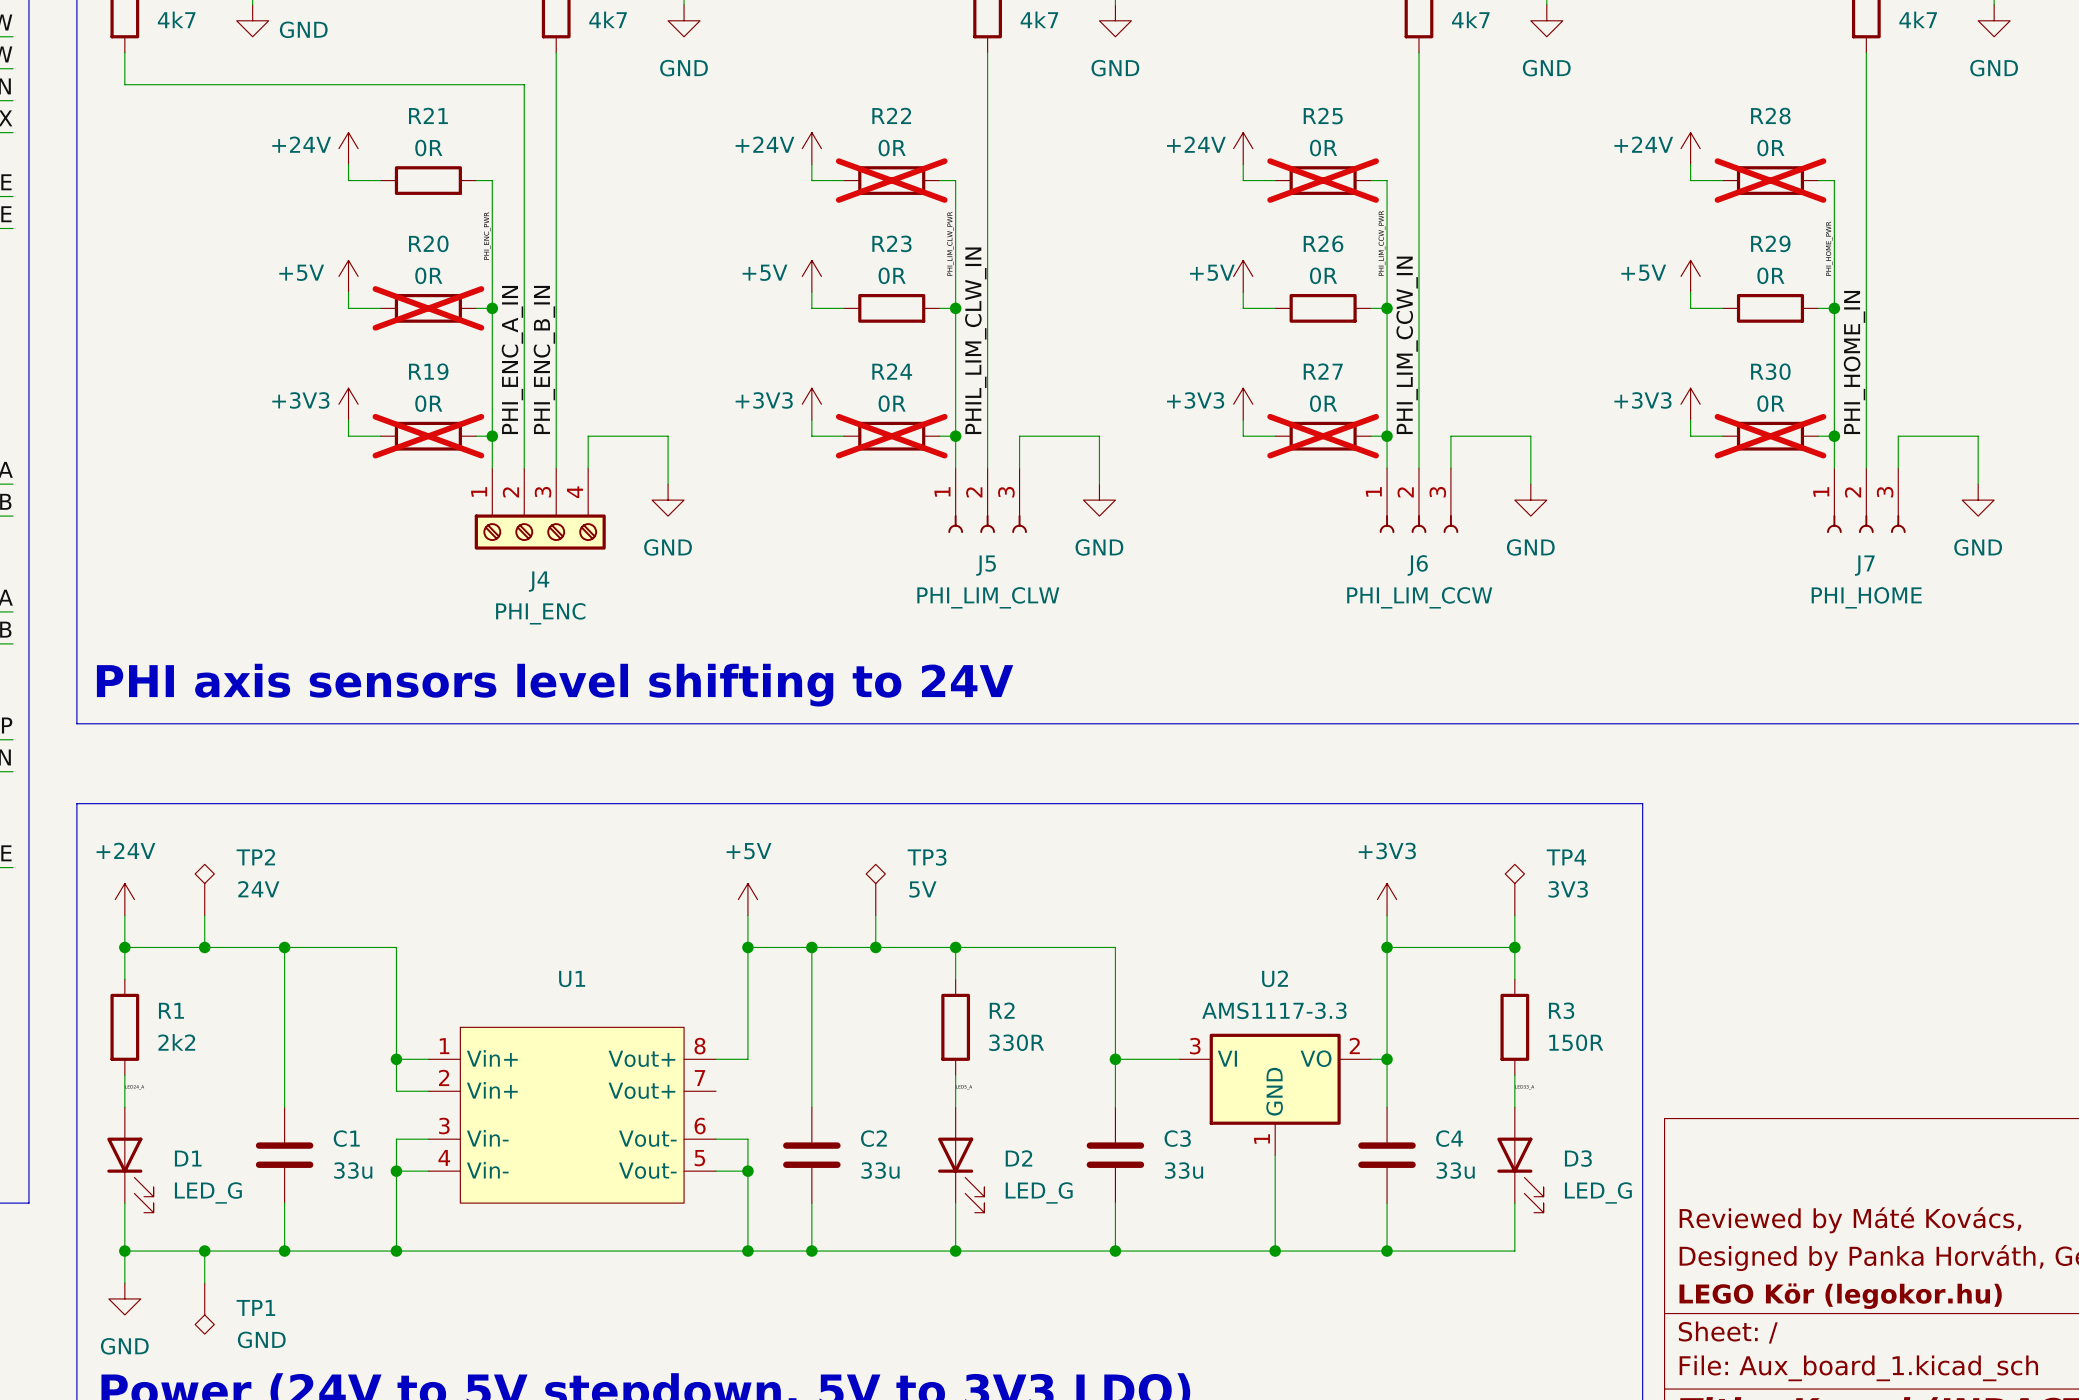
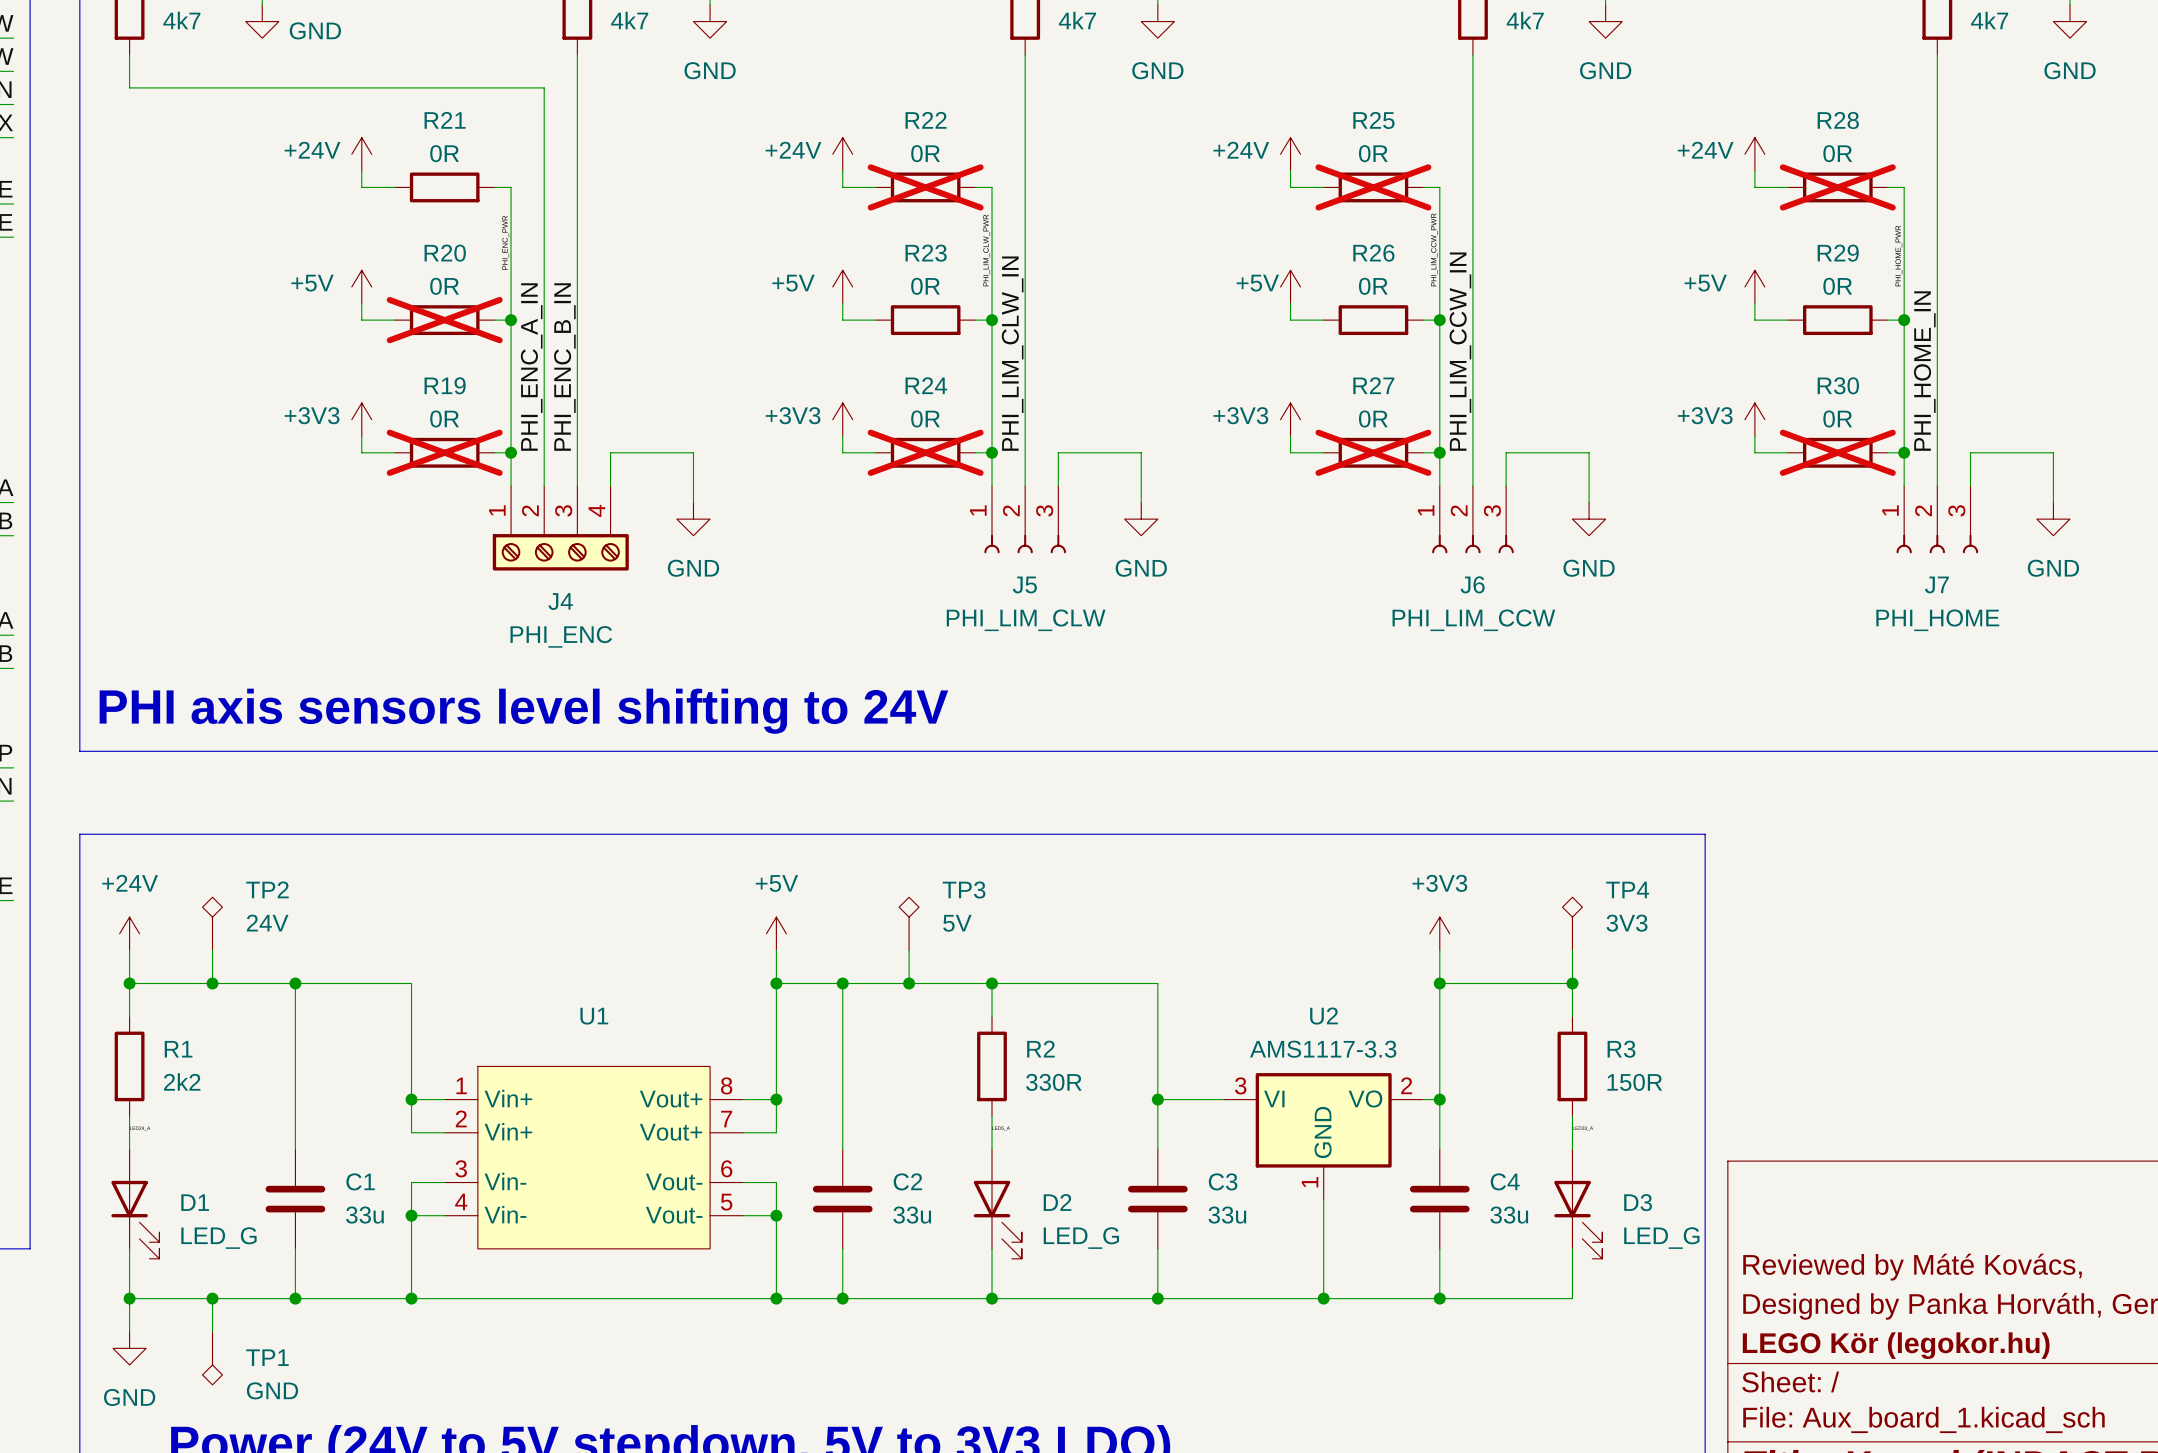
label: PHIL_LIM_CLW_IN (975, 340) -> PHI_LIM_CLW_IN (1012, 353)
wire: none -> (776, 1099) (776, 1132) (743, 1132)
junction: none -> (776, 1099)

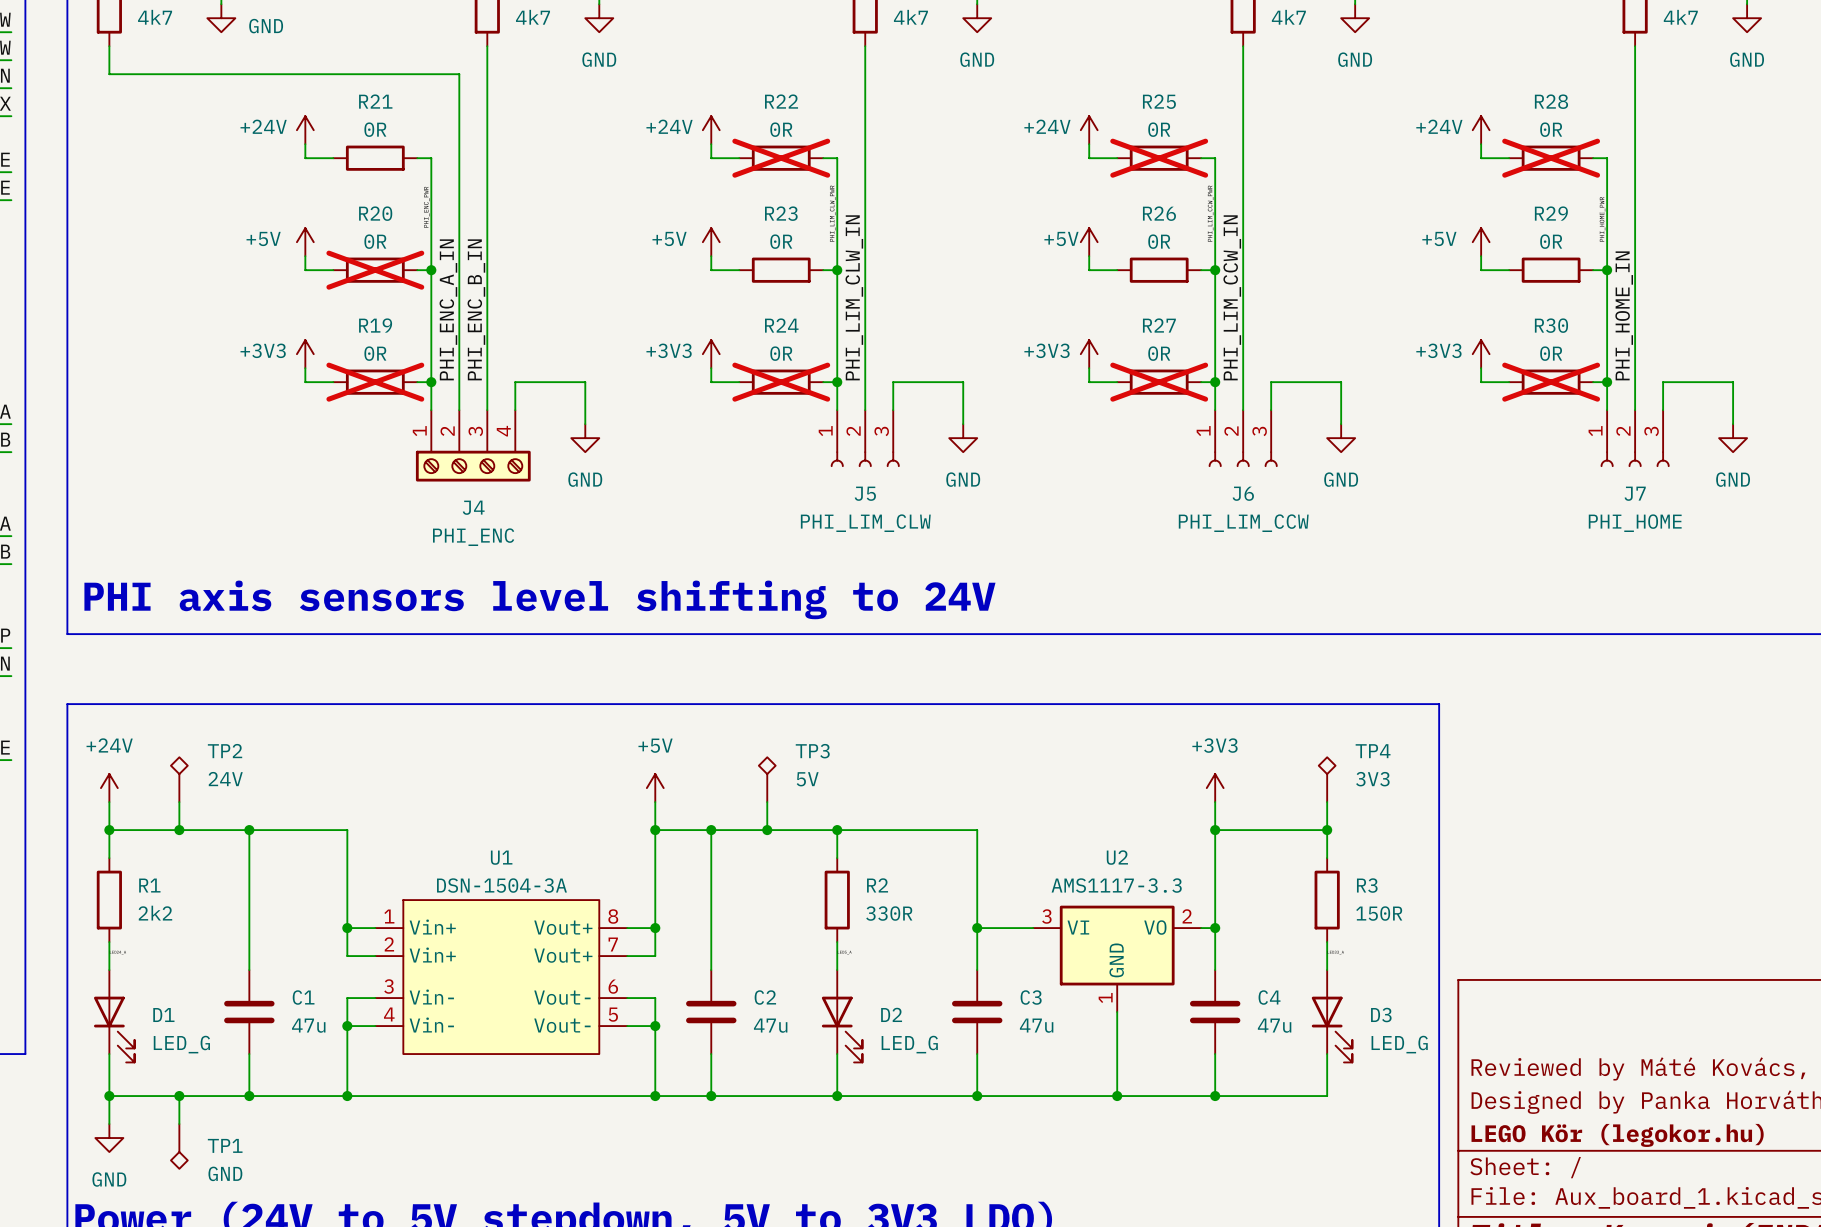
U1 value: none -> DSN-1504-3A (501, 885)
C1 value: 33u (364, 1215) -> 47u (308, 1025)
C2 value: 33u (912, 1215) -> 47u (770, 1025)
C3 value: 33u (1227, 1215) -> 47u (1036, 1025)
C4 value: 33u (1509, 1215) -> 47u (1274, 1025)

